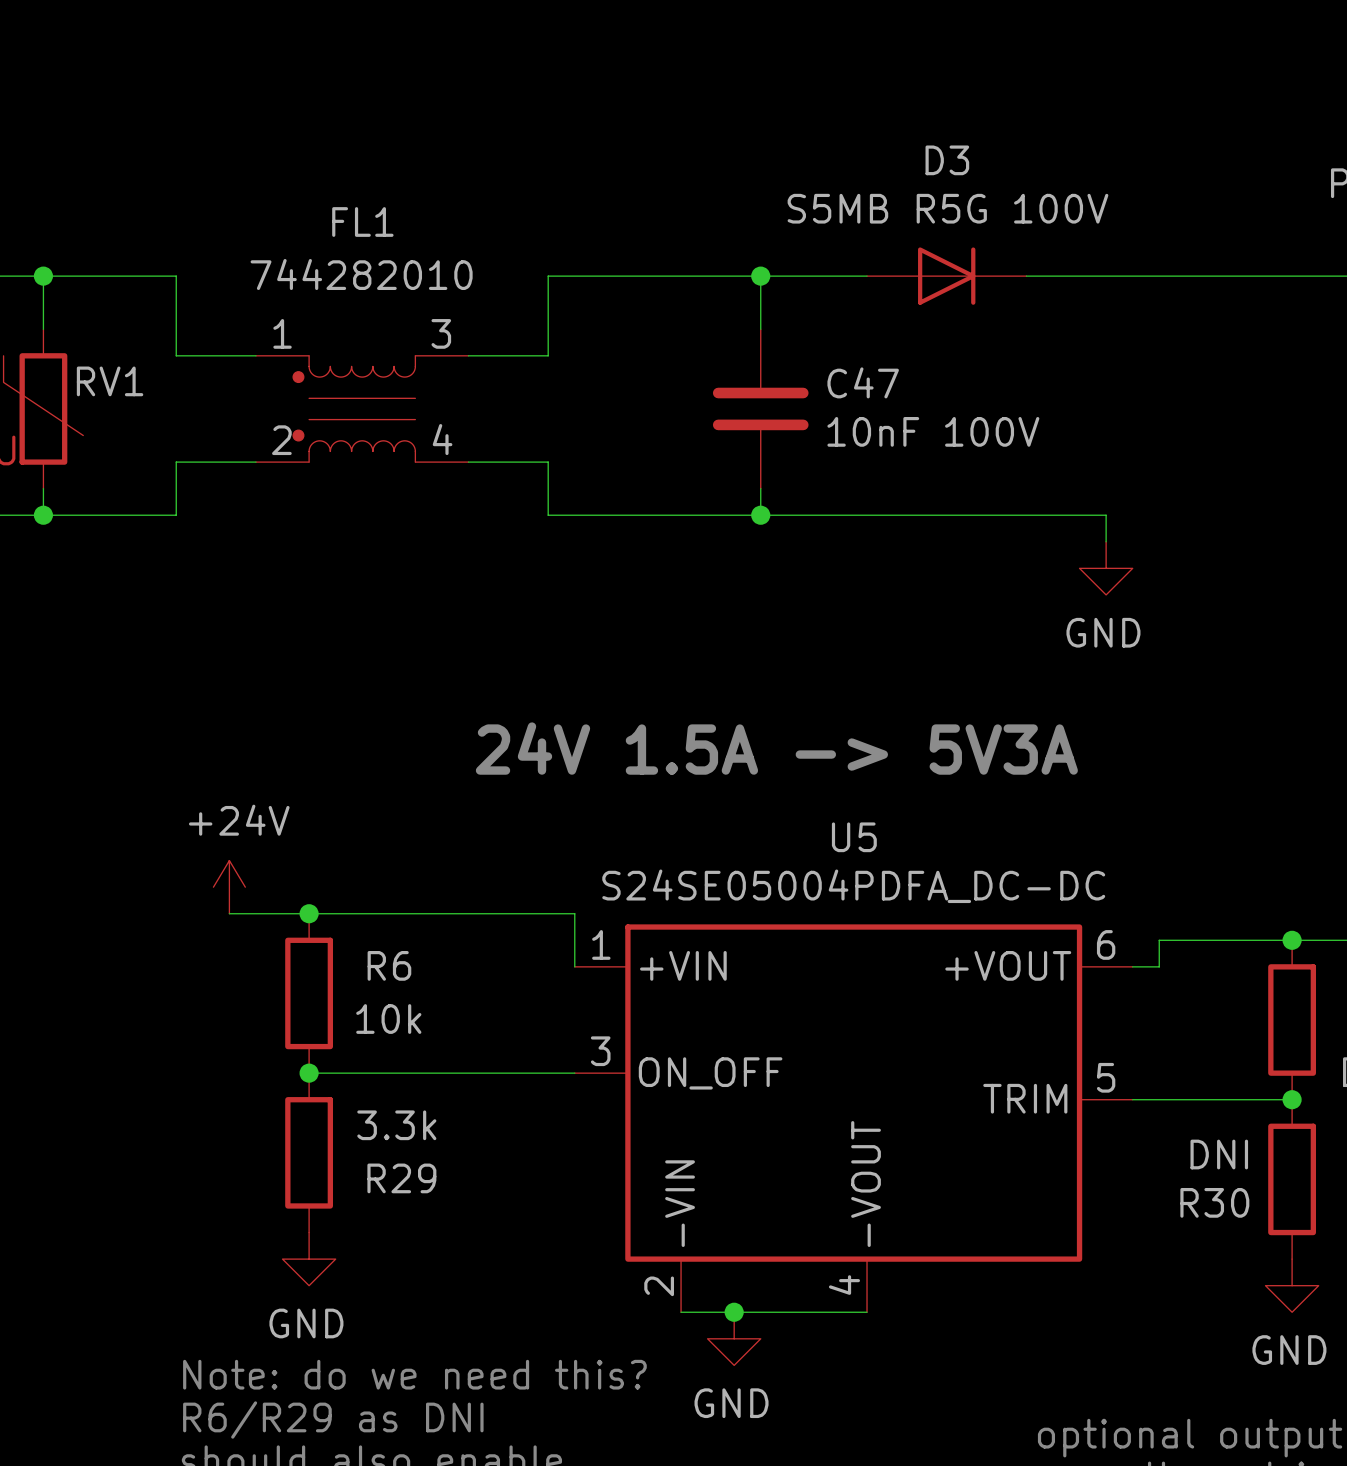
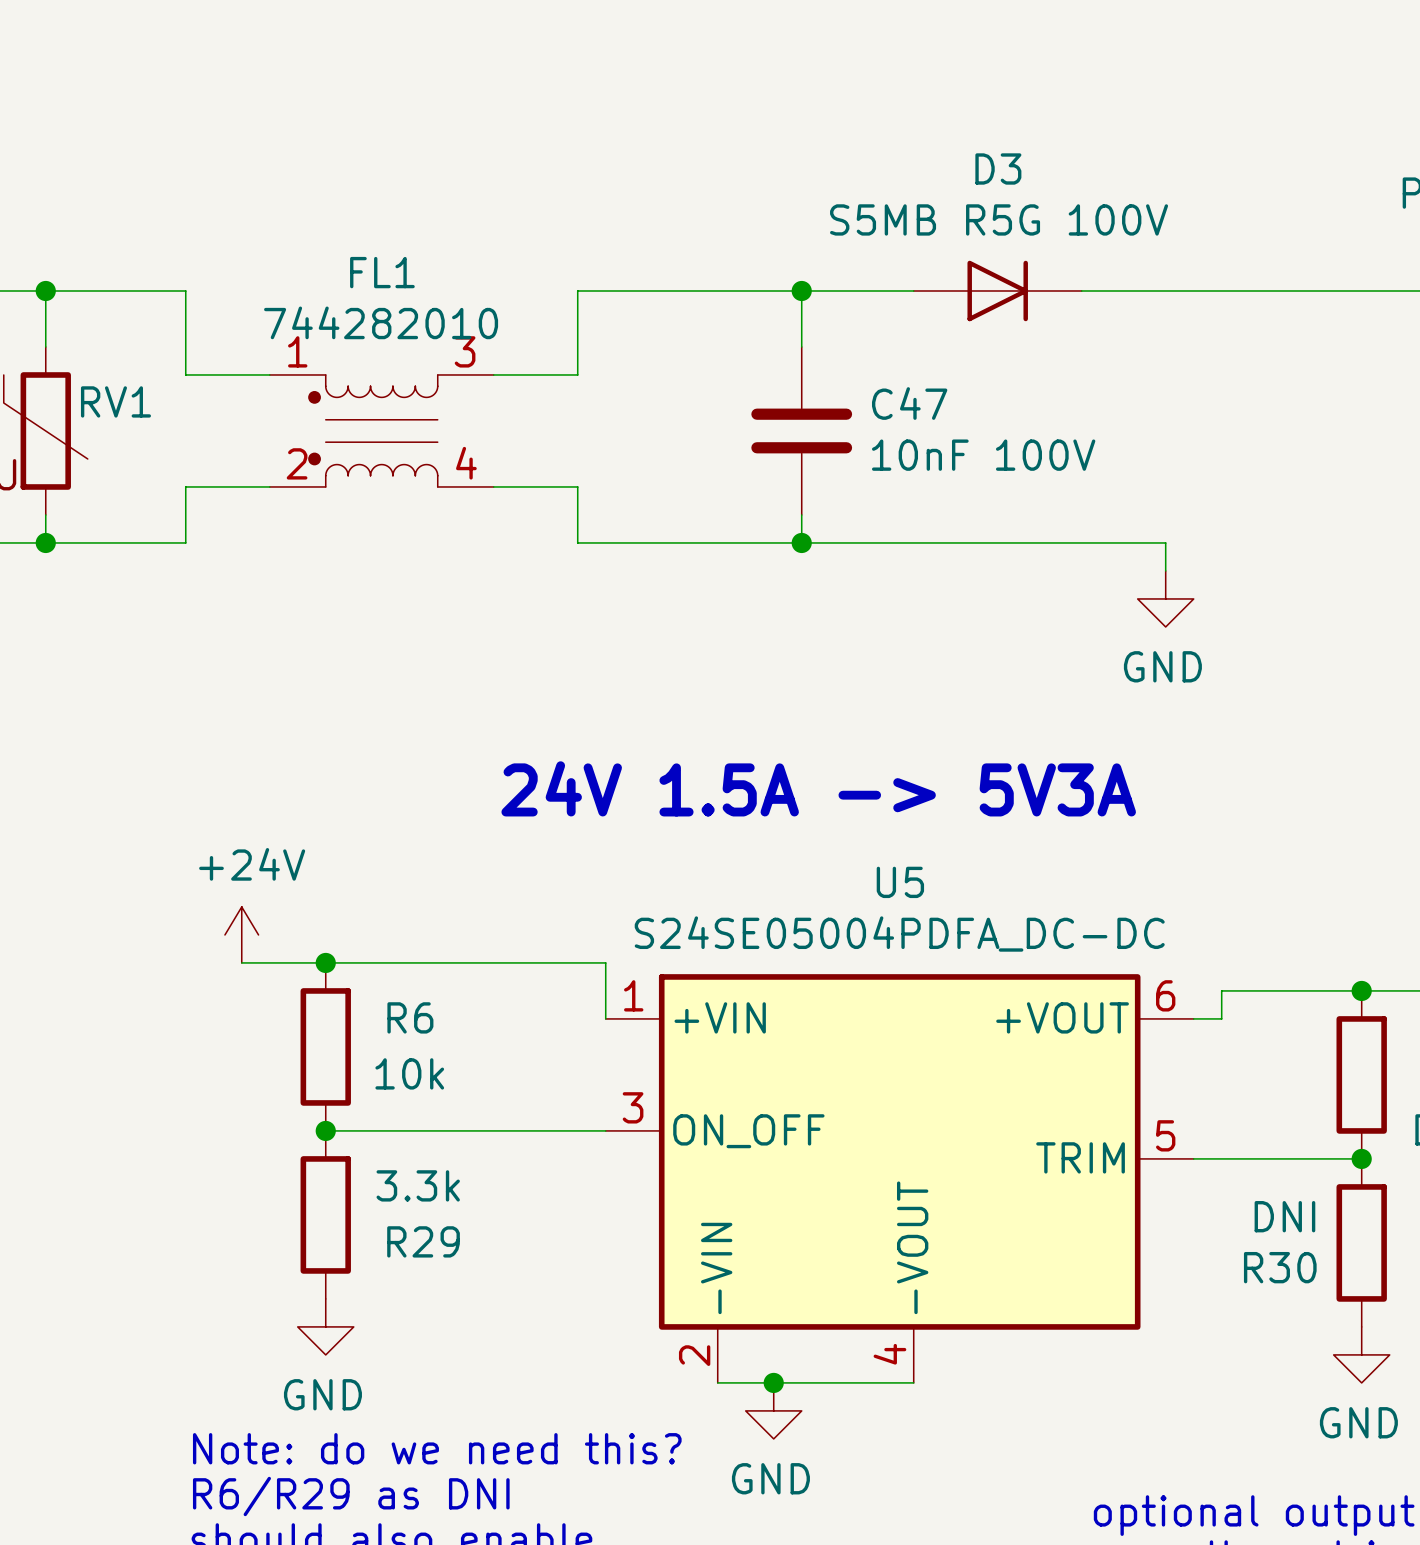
FL1 name position: FL1 (362, 221) -> FL1 (382, 272)
FL1 value position: 744282010 (361, 274) -> 744282010 (381, 322)

